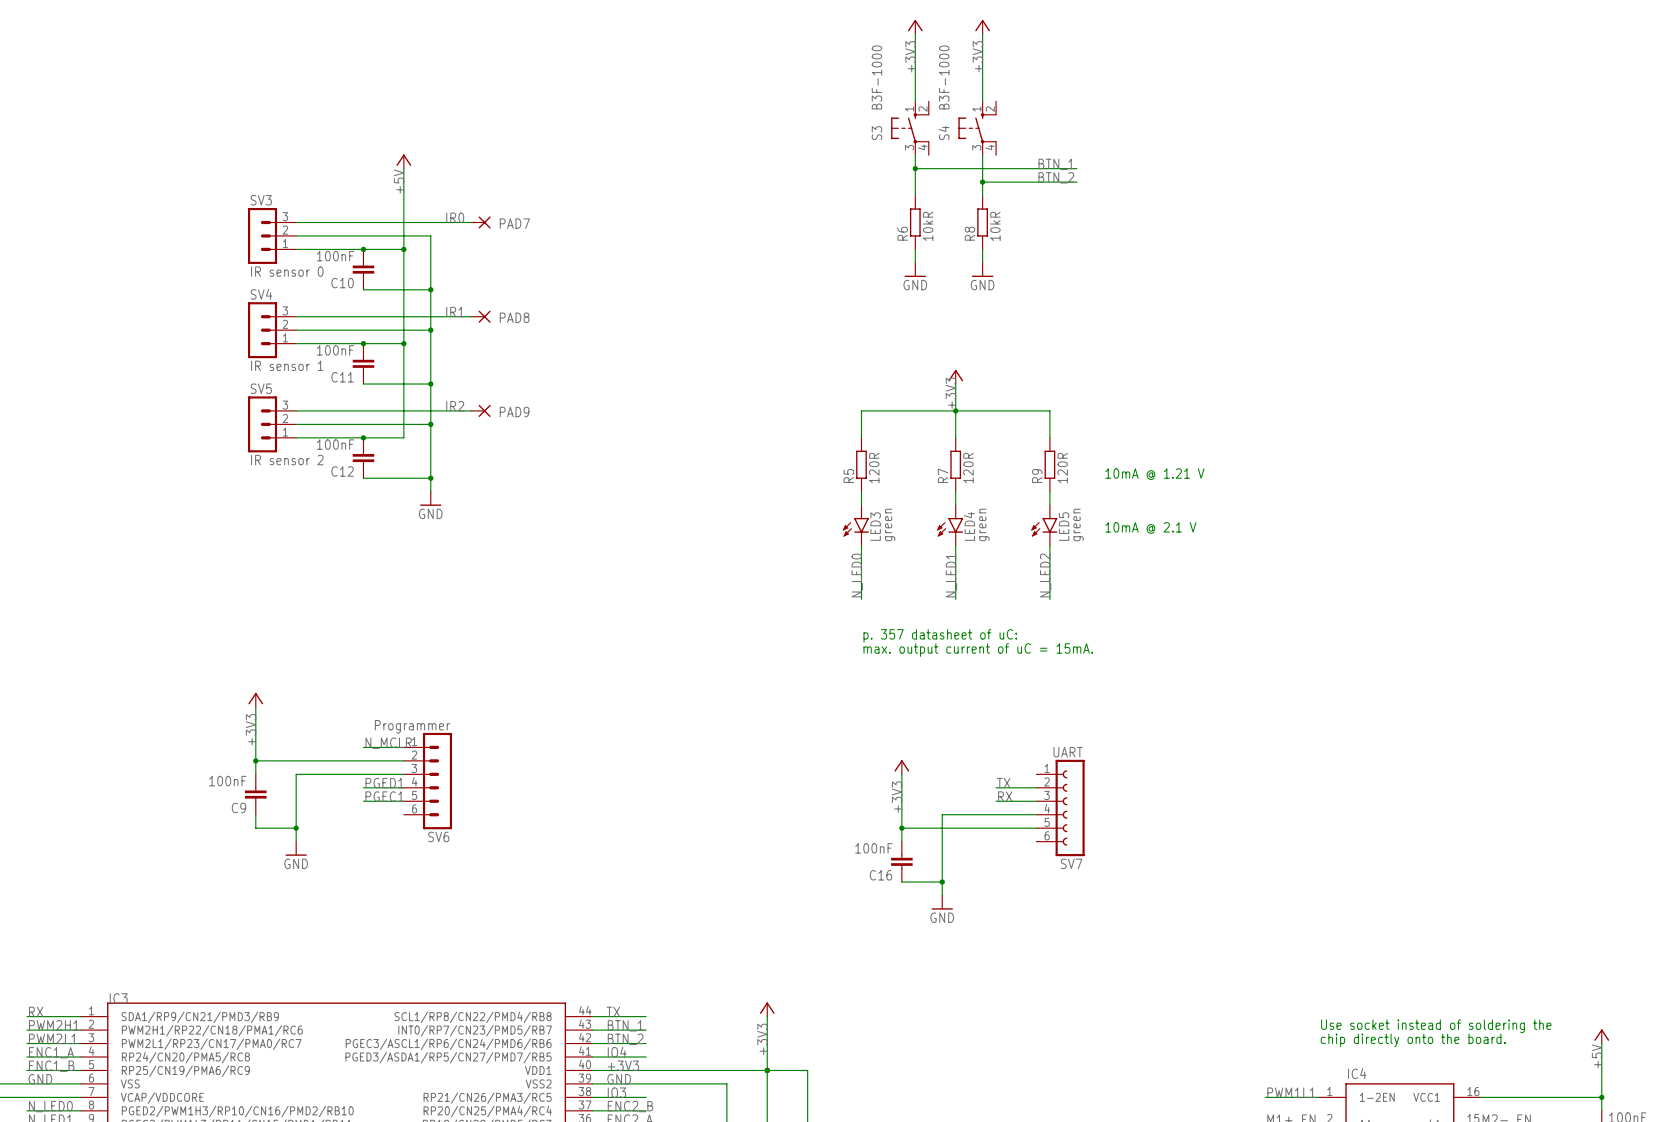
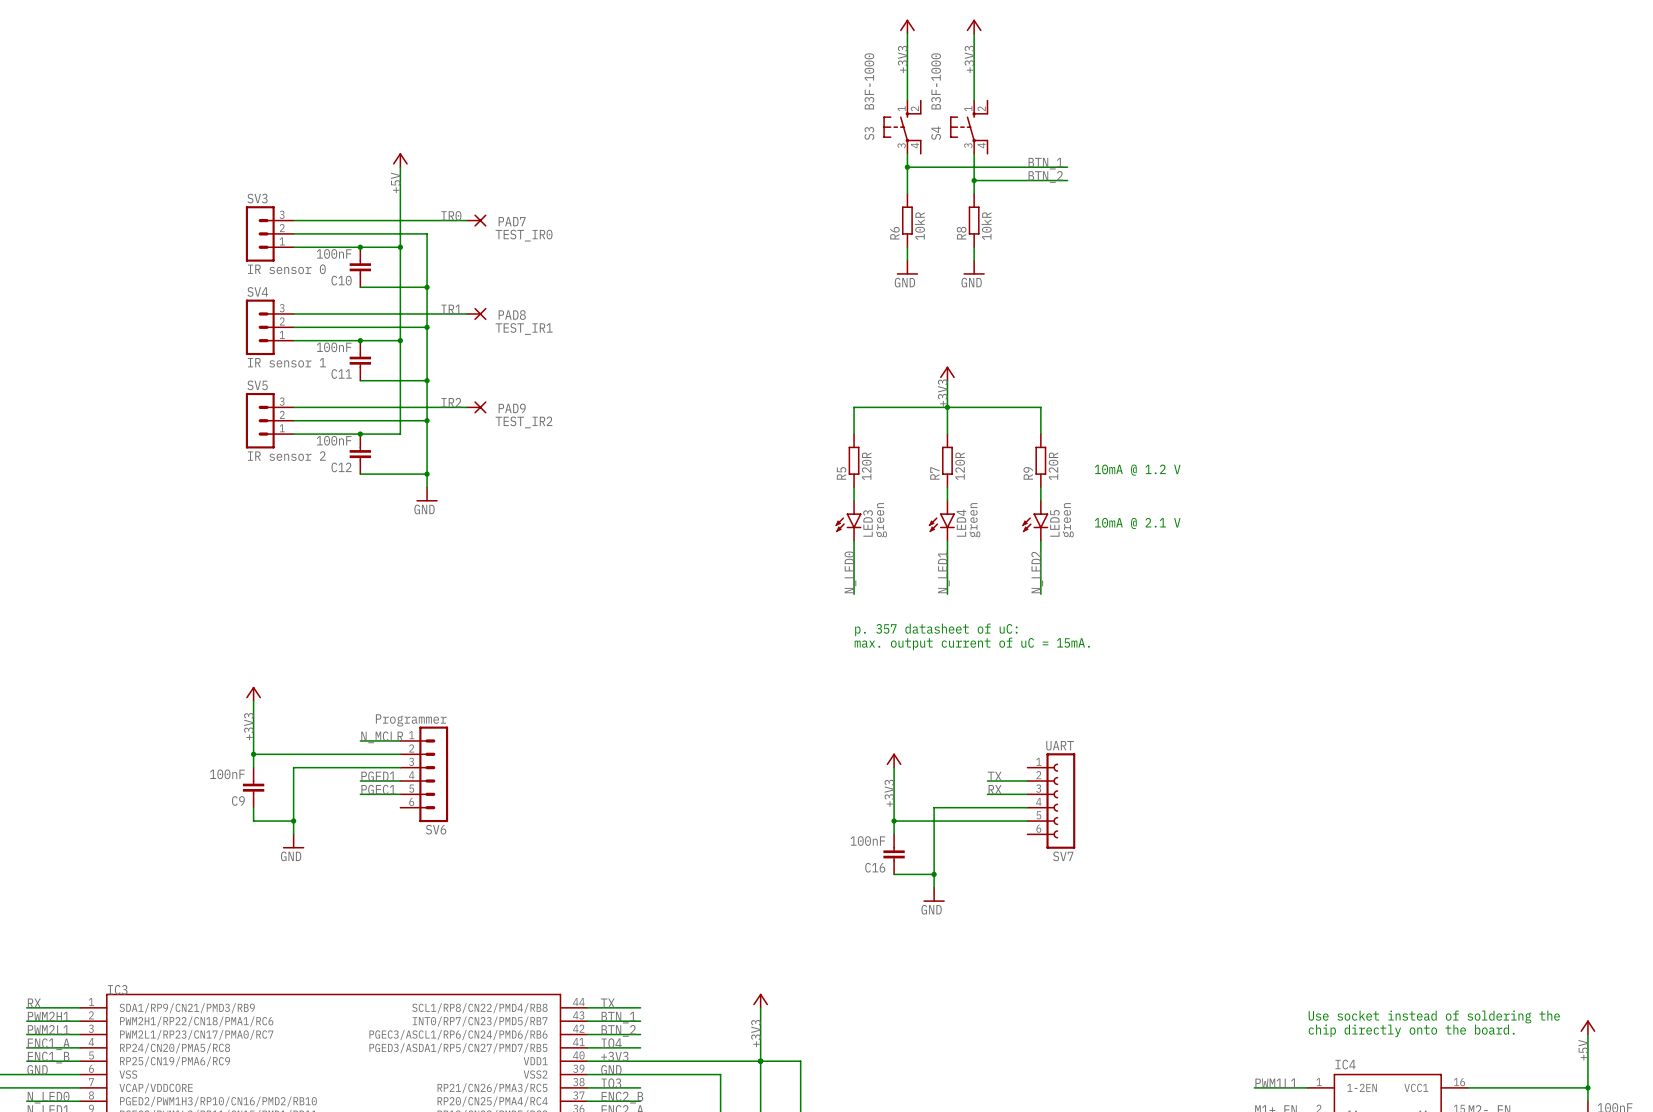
PAD7 value: none -> TEST_IR0 (524, 235)
PAD8 value: none -> TEST_IR1 (524, 329)
PAD9 value: none -> TEST_IR2 (524, 422)
text: 10mA @ 1.21 V (1154, 474) -> 10mA @ 1.2 V (1137, 470)

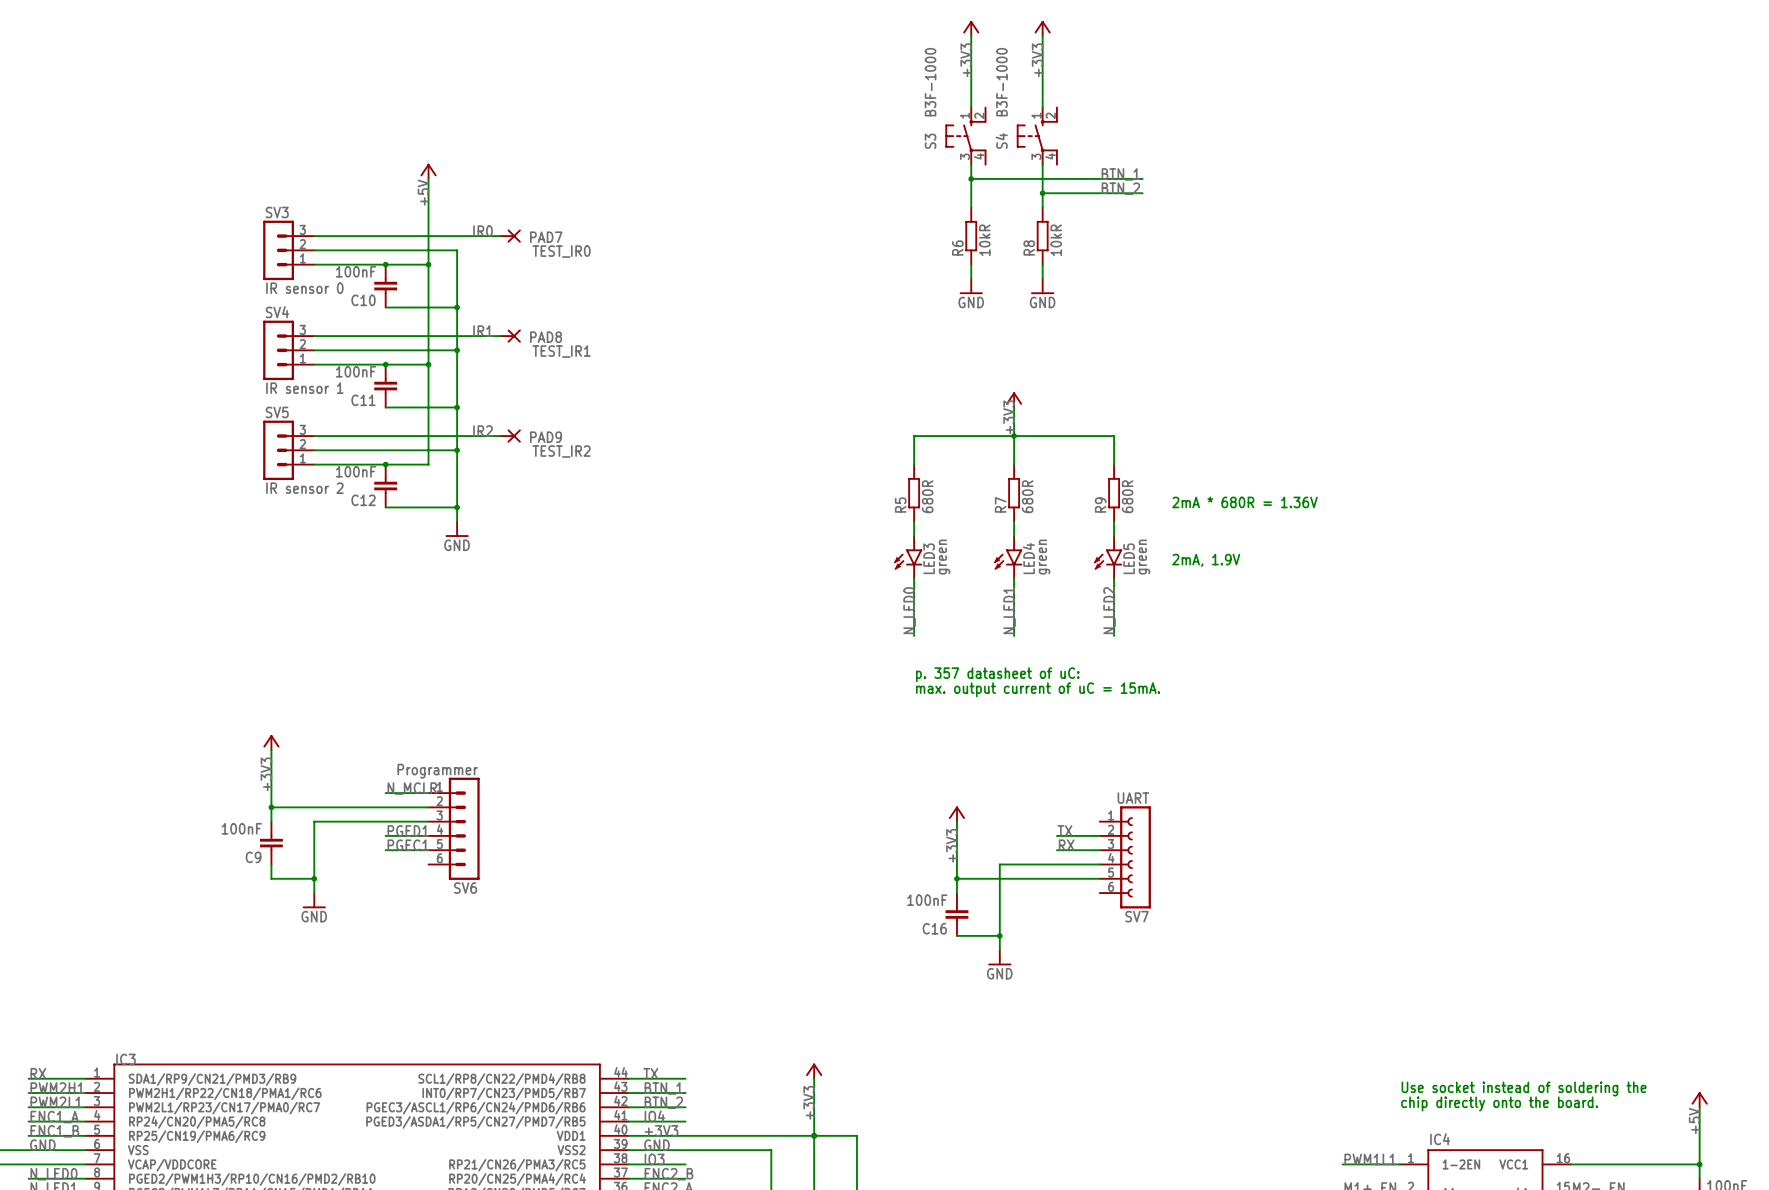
R5 value: 120R (866, 466) -> 680R (927, 496)
R7 value: 120R (960, 466) -> 680R (1027, 496)
R9 value: 120R (1053, 466) -> 680R (1127, 496)
text: 10mA @ 1.2 V (1137, 470) -> 2mA * 680R = 1.36V (1244, 502)
text: 10mA @ 2.1 V (1137, 523) -> 2mA, 1.9V (1206, 560)

